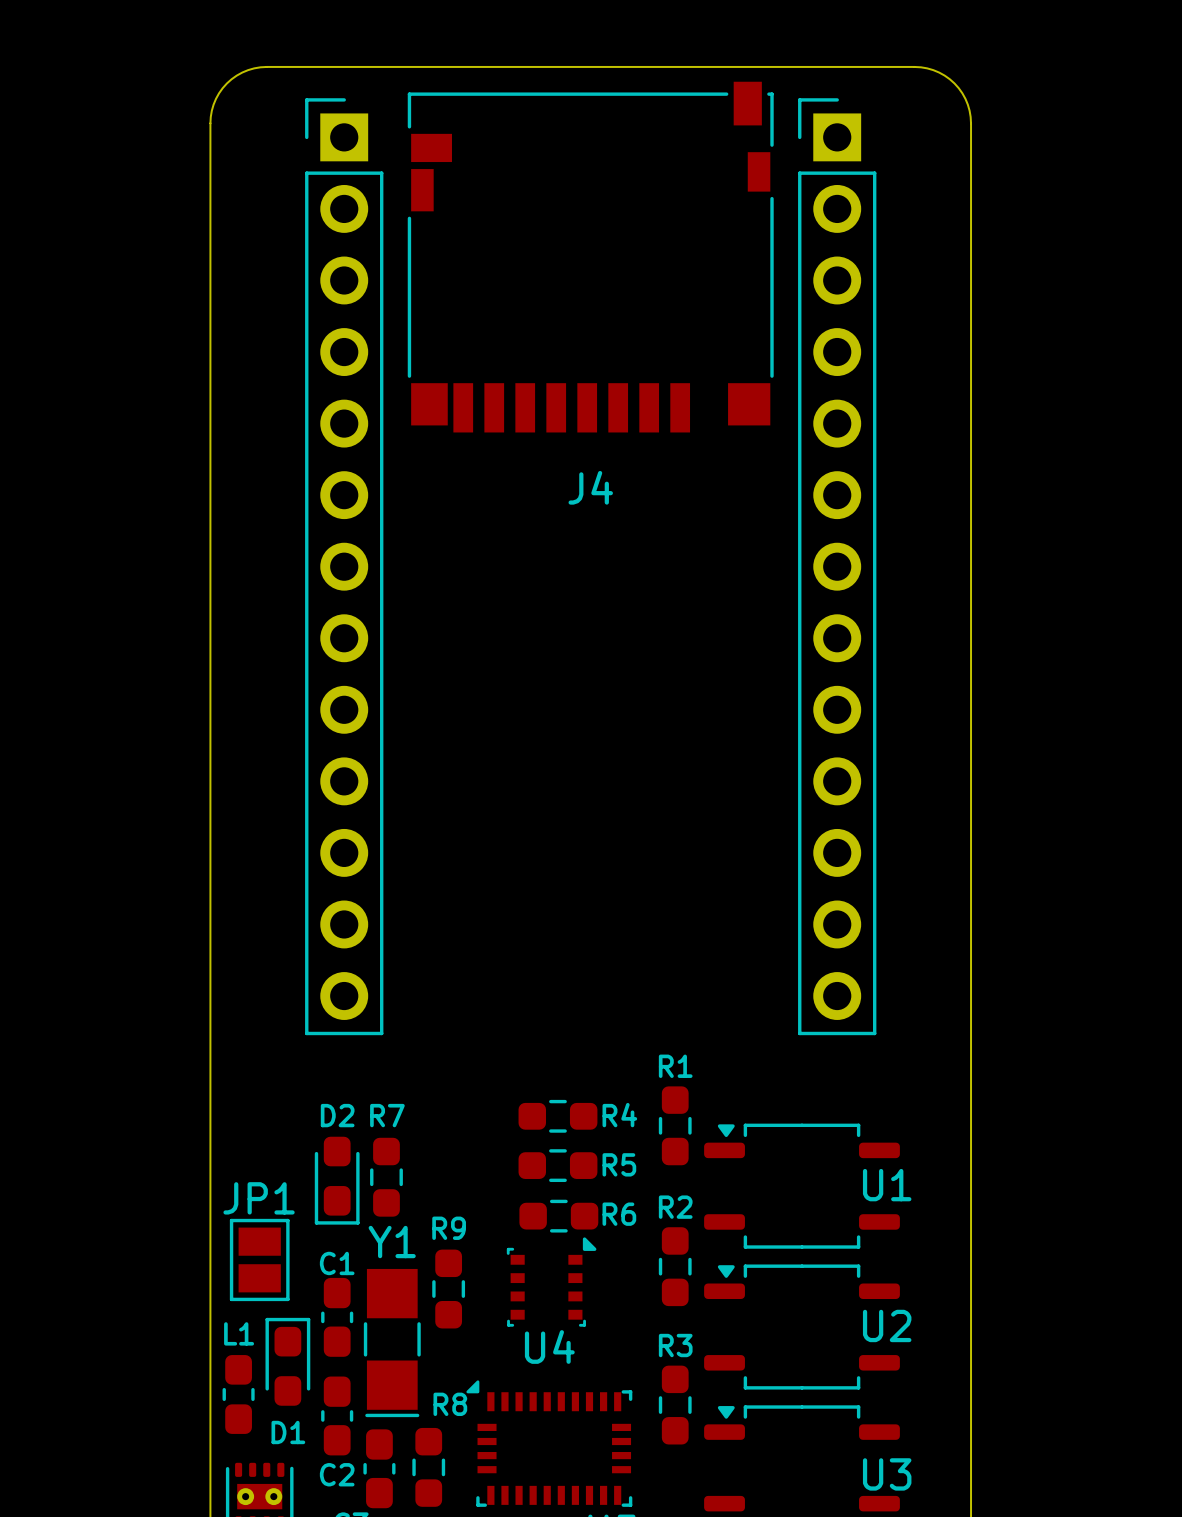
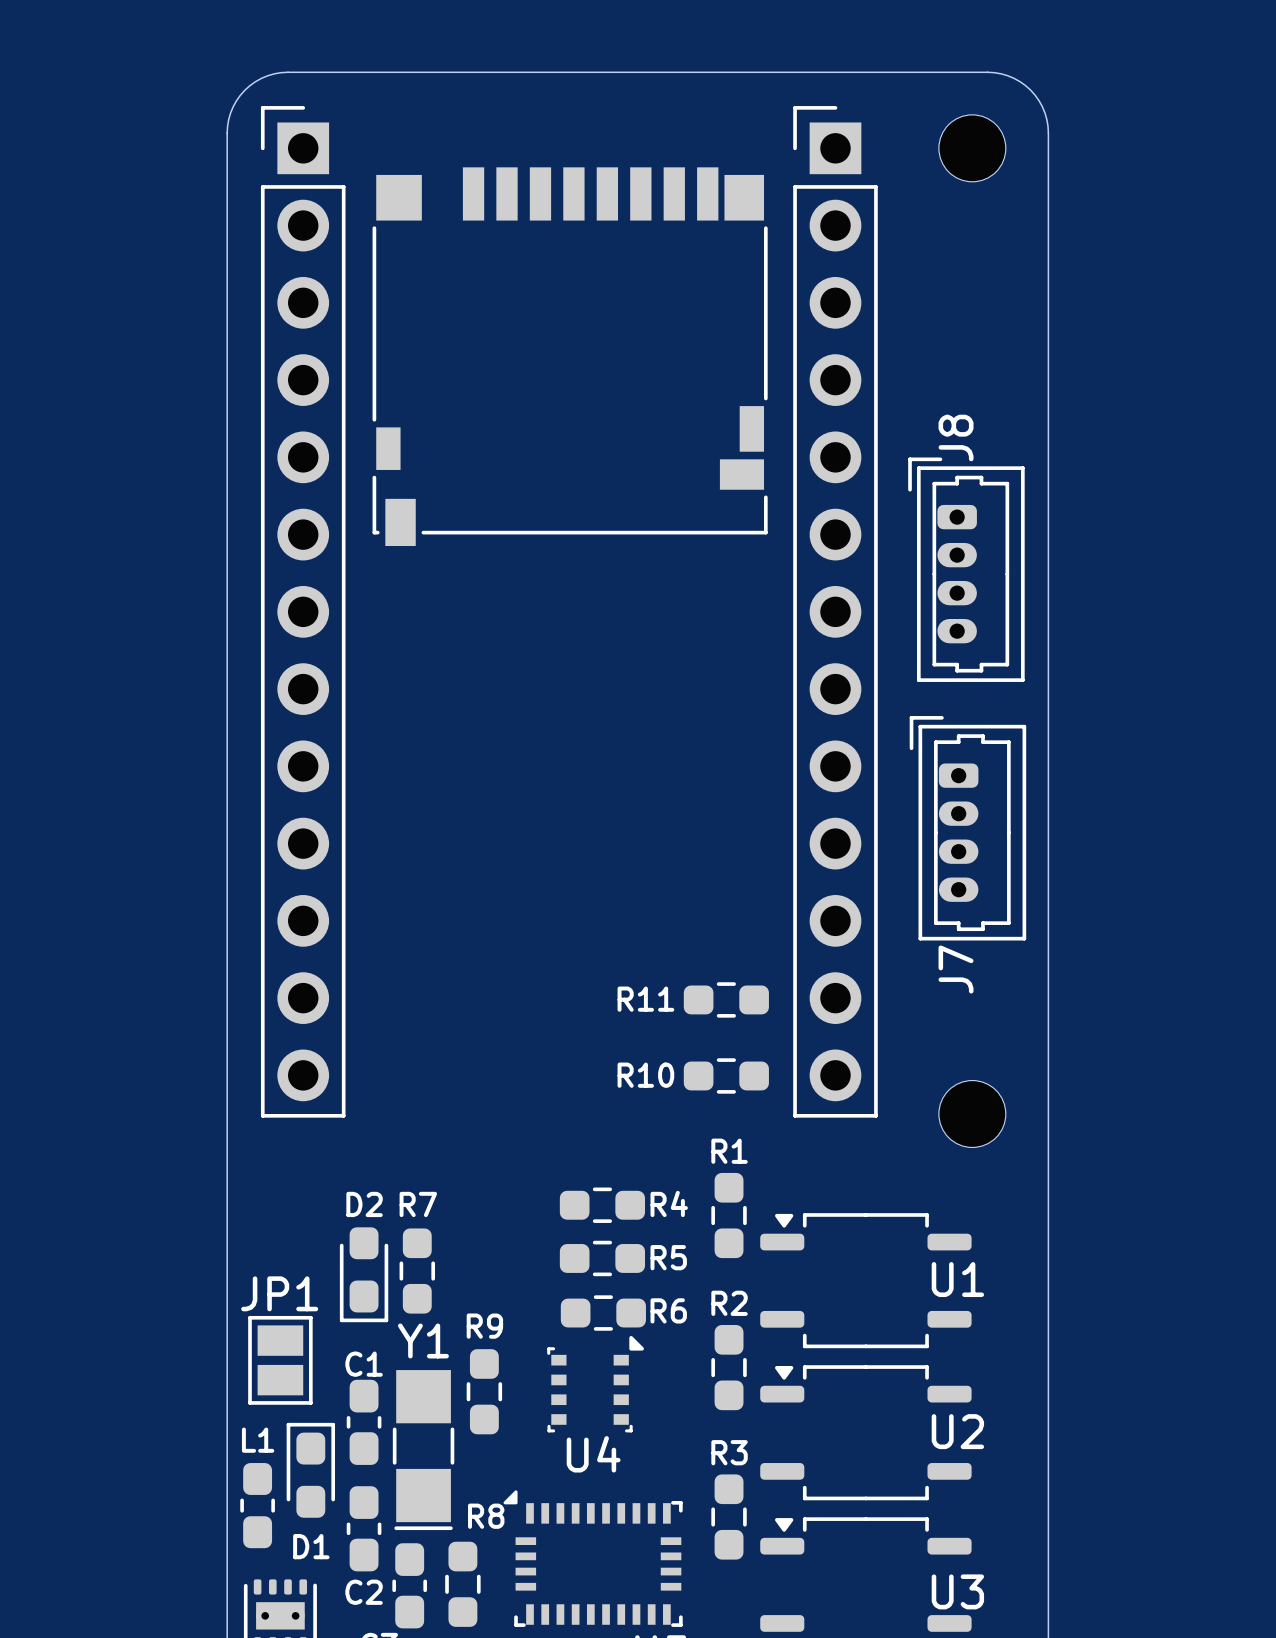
part: none -> (972, 148)
J4: (590, 257) -> none
part: none -> (570, 356)
J7: none -> (966, 569)
part position: (344, 566) -> (303, 611)
part position: (837, 566) -> (835, 611)
J8: none -> (967, 828)
R11: none -> (726, 999)
R10: none -> (726, 1075)
part: none -> (972, 1114)

